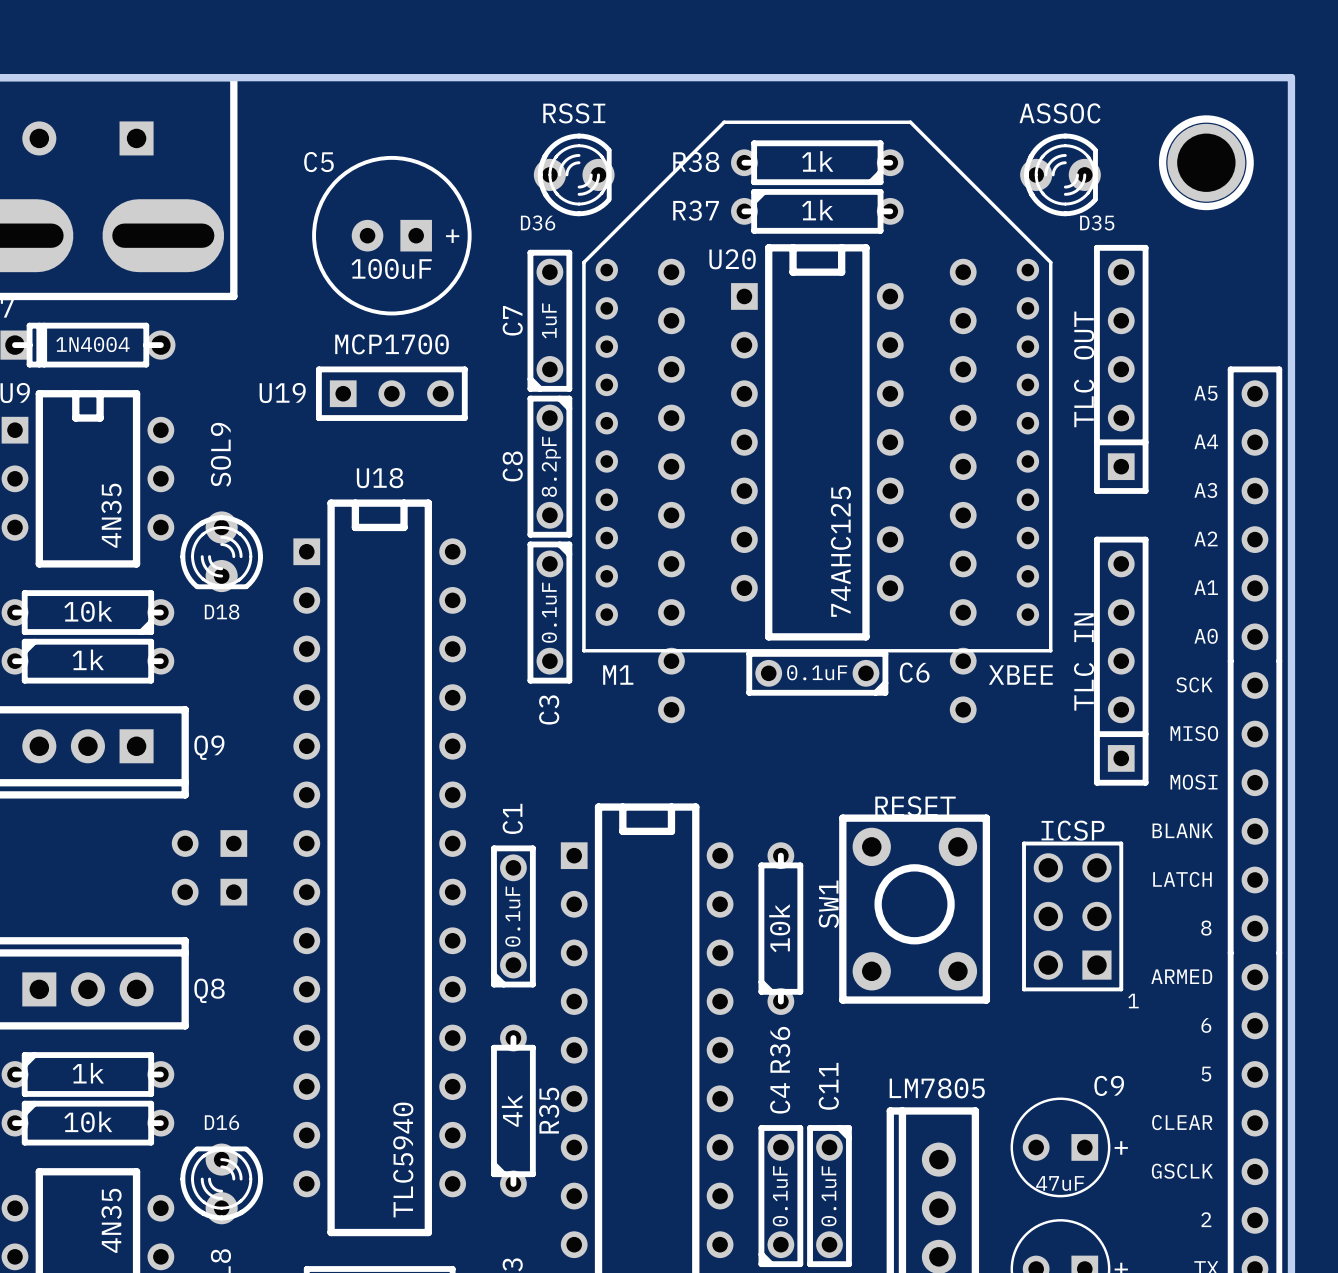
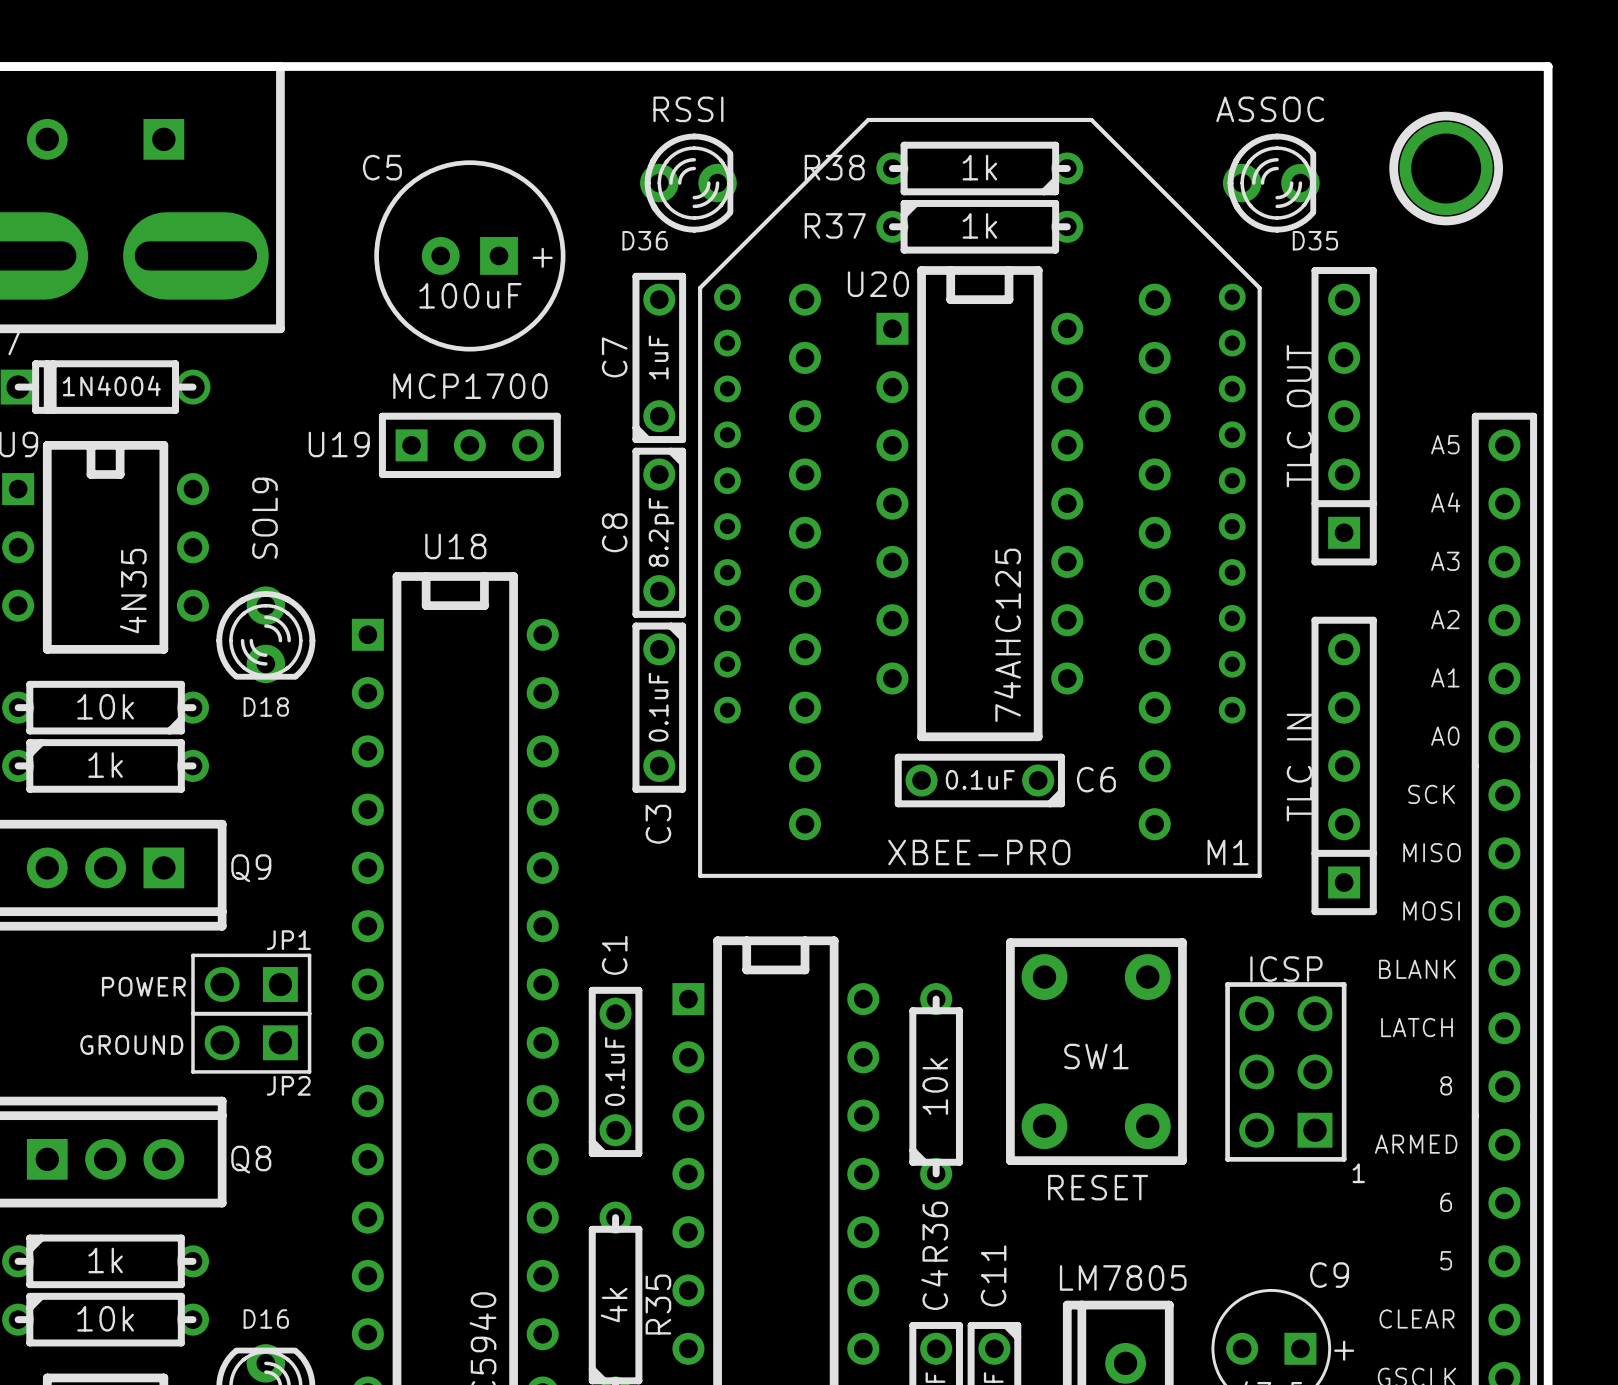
M1 footprint: [582, 120, 1053, 653] -> [698, 117, 1262, 878]
M1 name position: M1 (618, 675) -> M1 (1228, 852)
M1 value: XBEE (1020, 675) -> XBEE-PRO (979, 852)
SW1 value position: RESET (915, 806) -> RESET (1098, 1187)
SW1 footprint: [839, 814, 991, 1004] -> [1006, 938, 1187, 1166]
part: (209, 843) -> none
JP1: none -> POWER (251, 984)
part: (209, 892) -> none
JP2: none -> GROUND (251, 1042)
SW1 name position: SW1 (828, 904) -> SW1 (1096, 1056)

